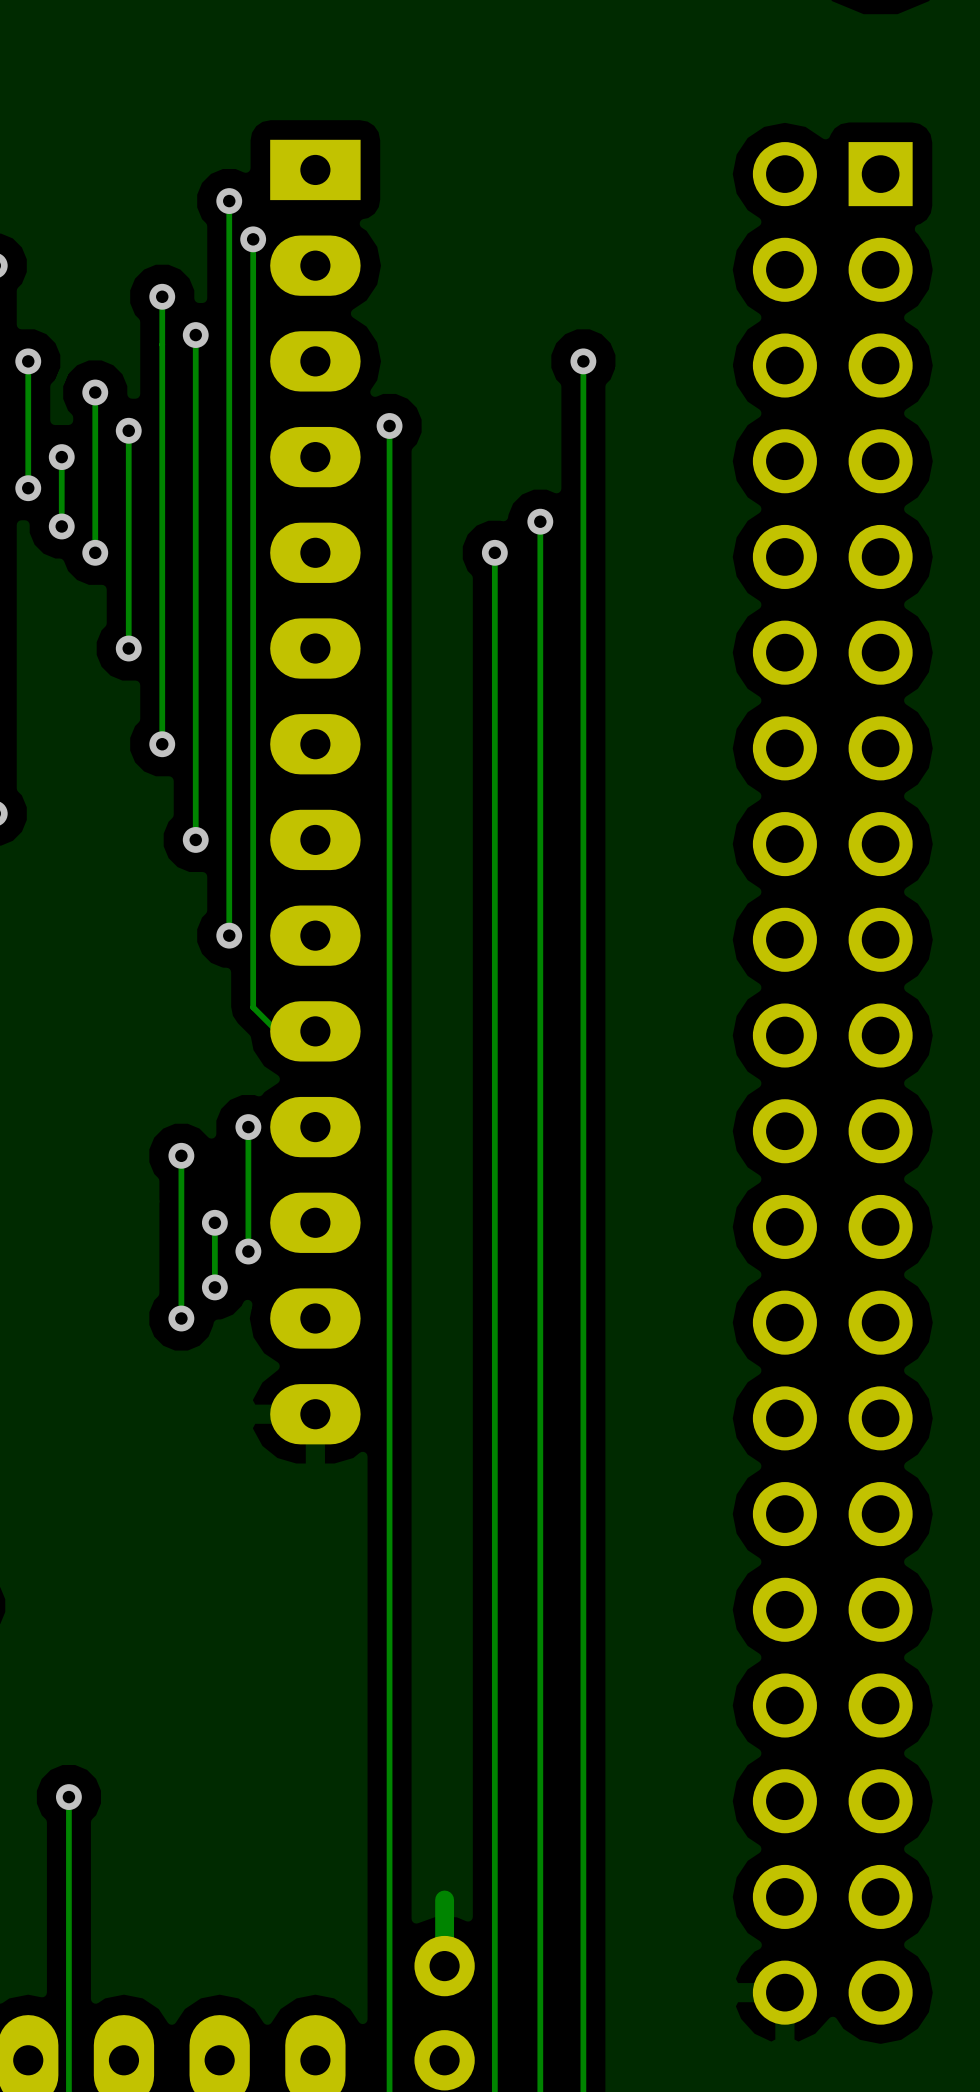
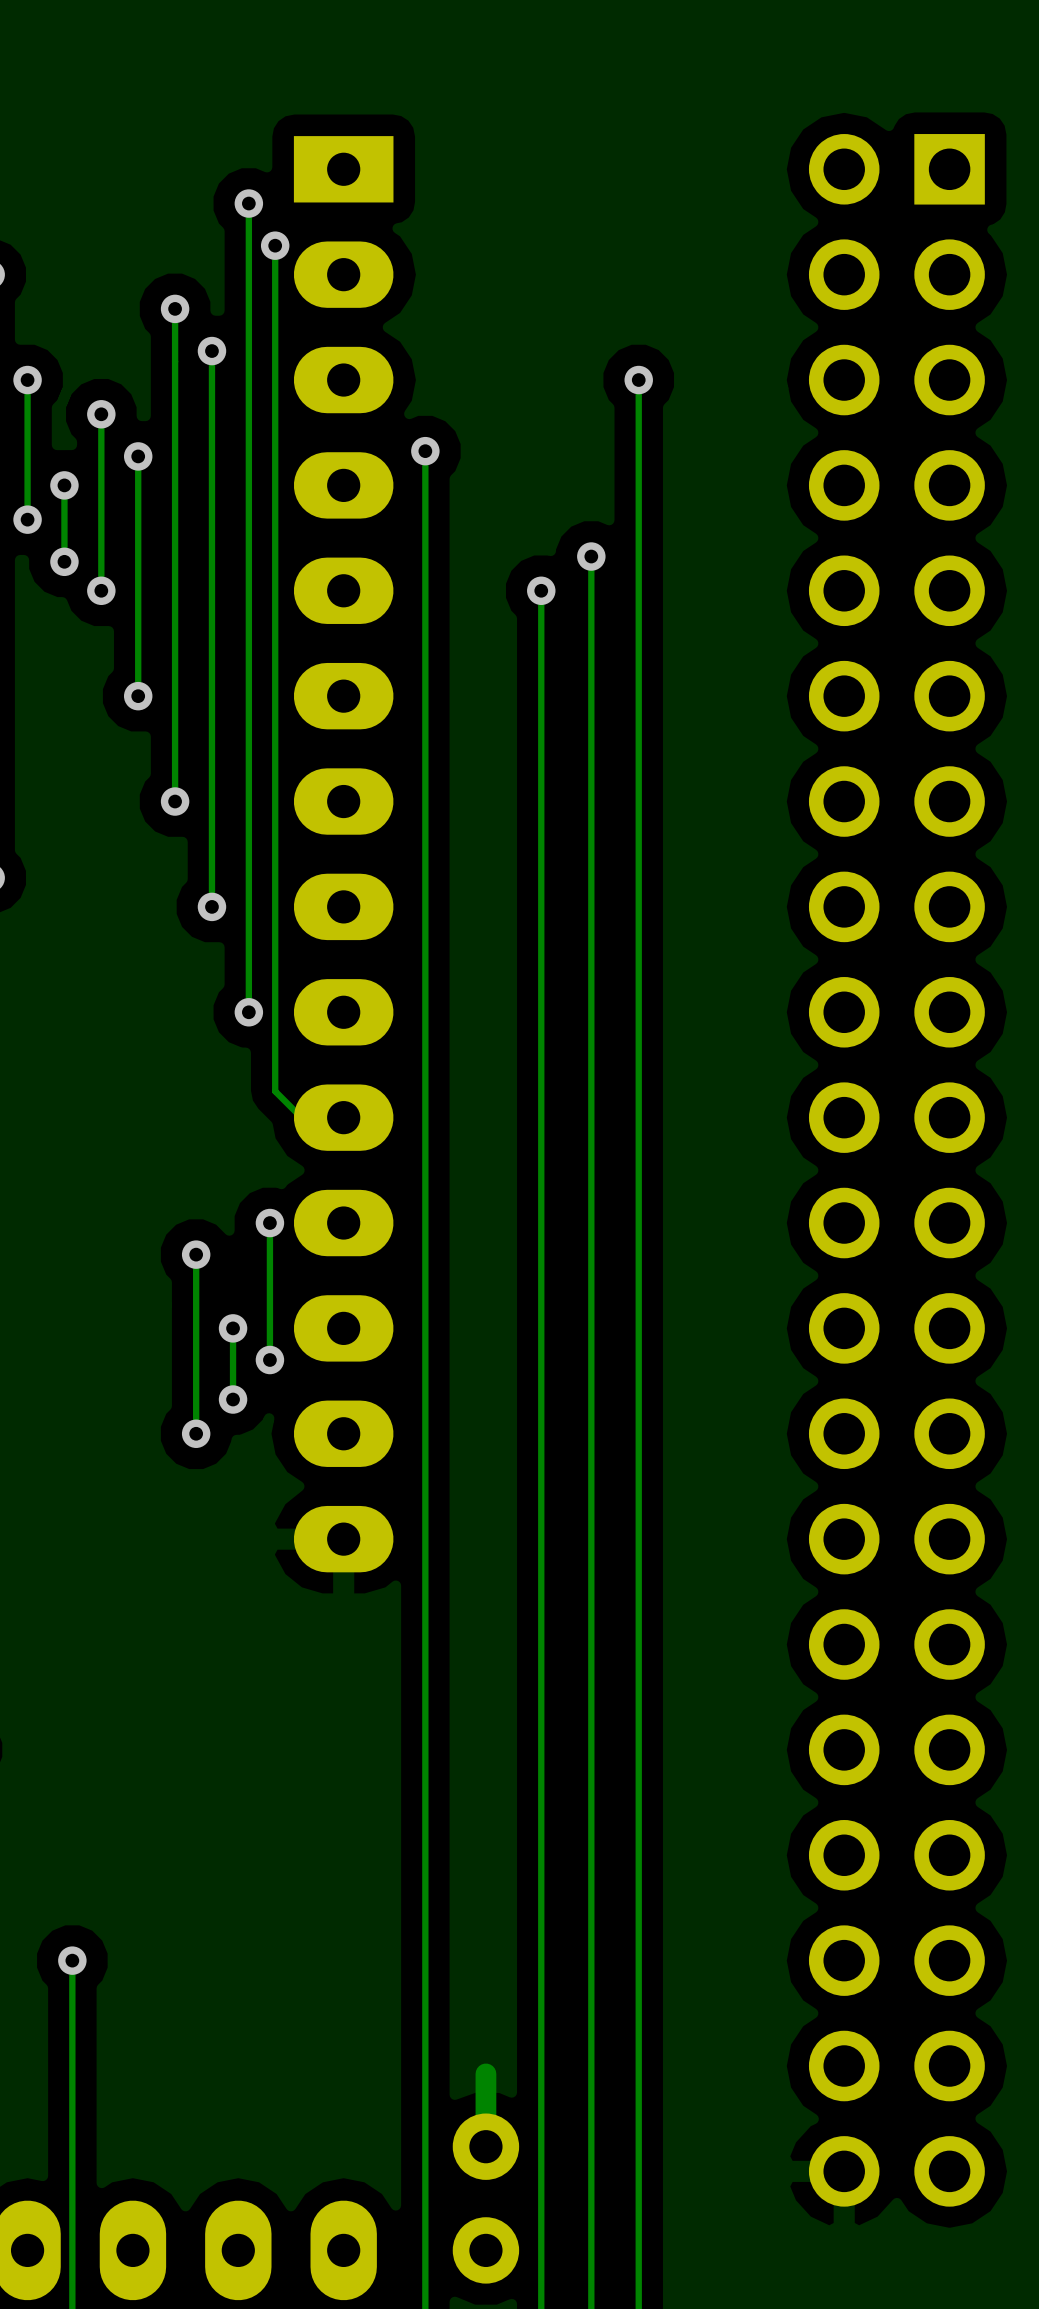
part position: (832, 1083) -> (896, 1170)

